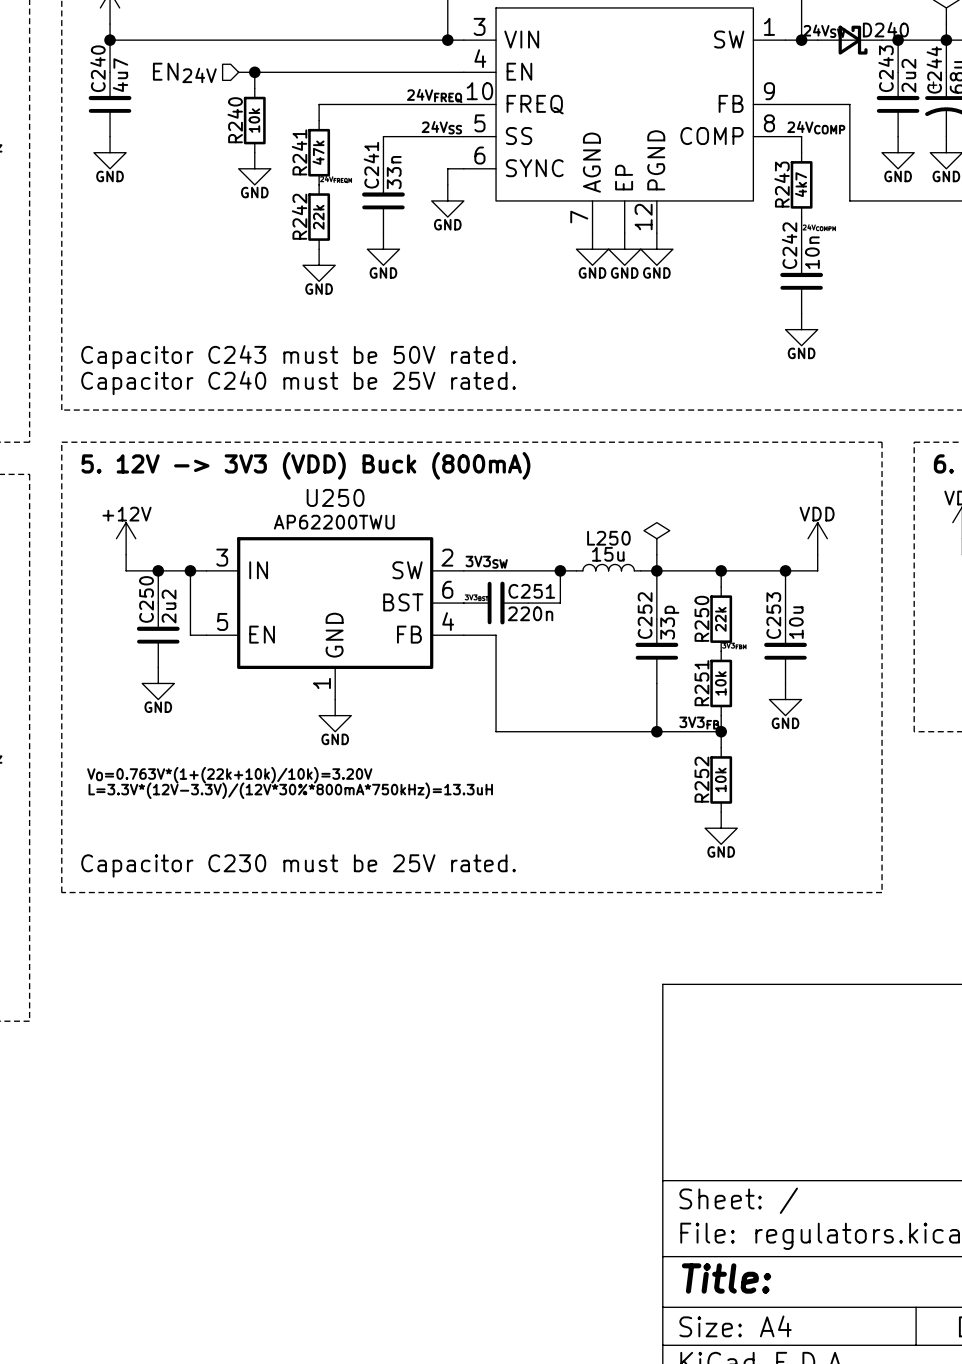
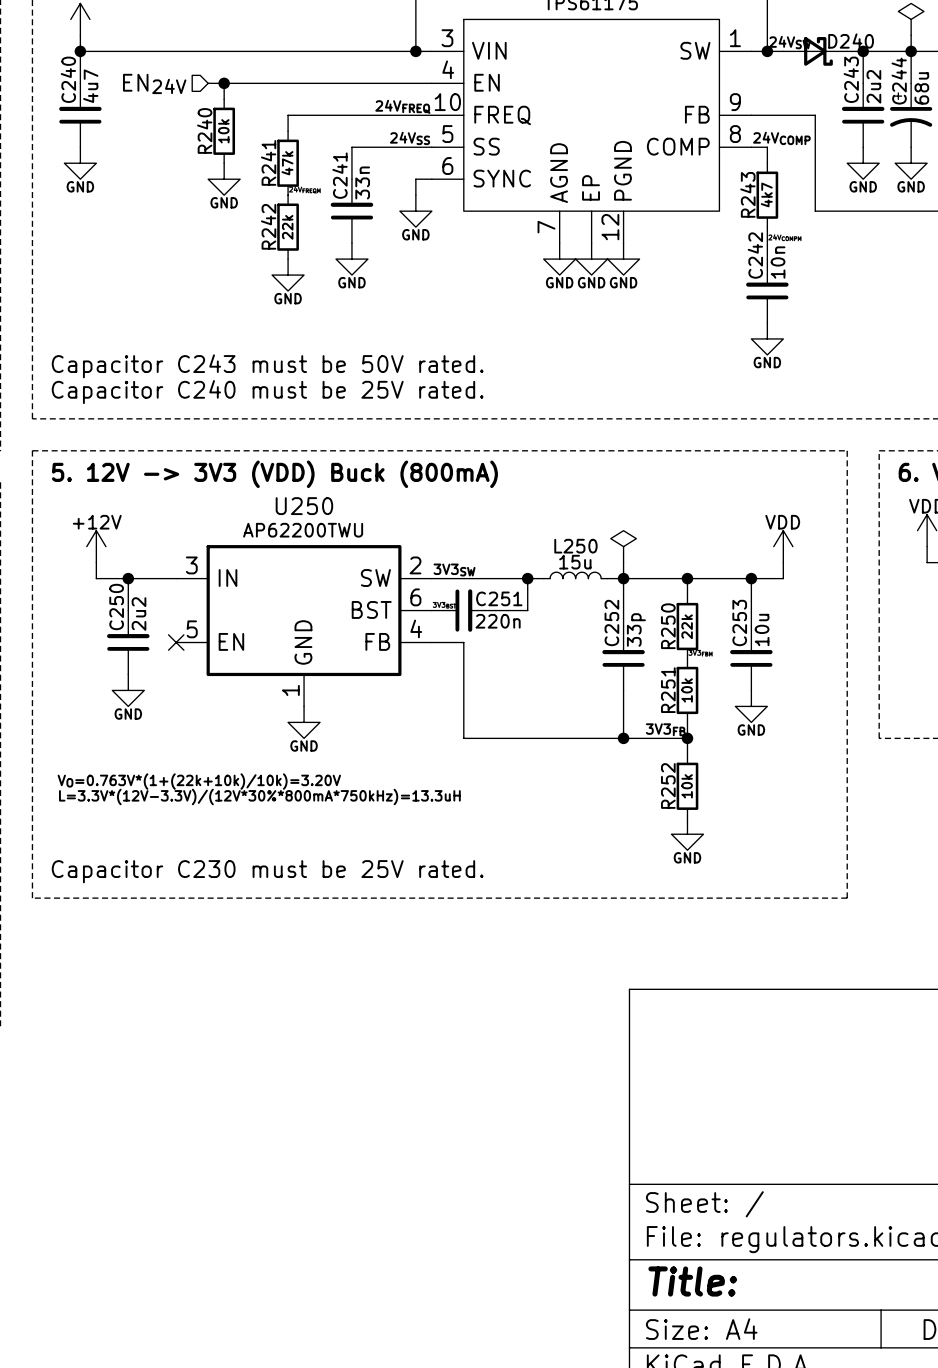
wire: (190, 570) (190, 635) (206, 635) -> none
junction: (190, 570) -> none
no-connect mark: none -> (176, 642)

